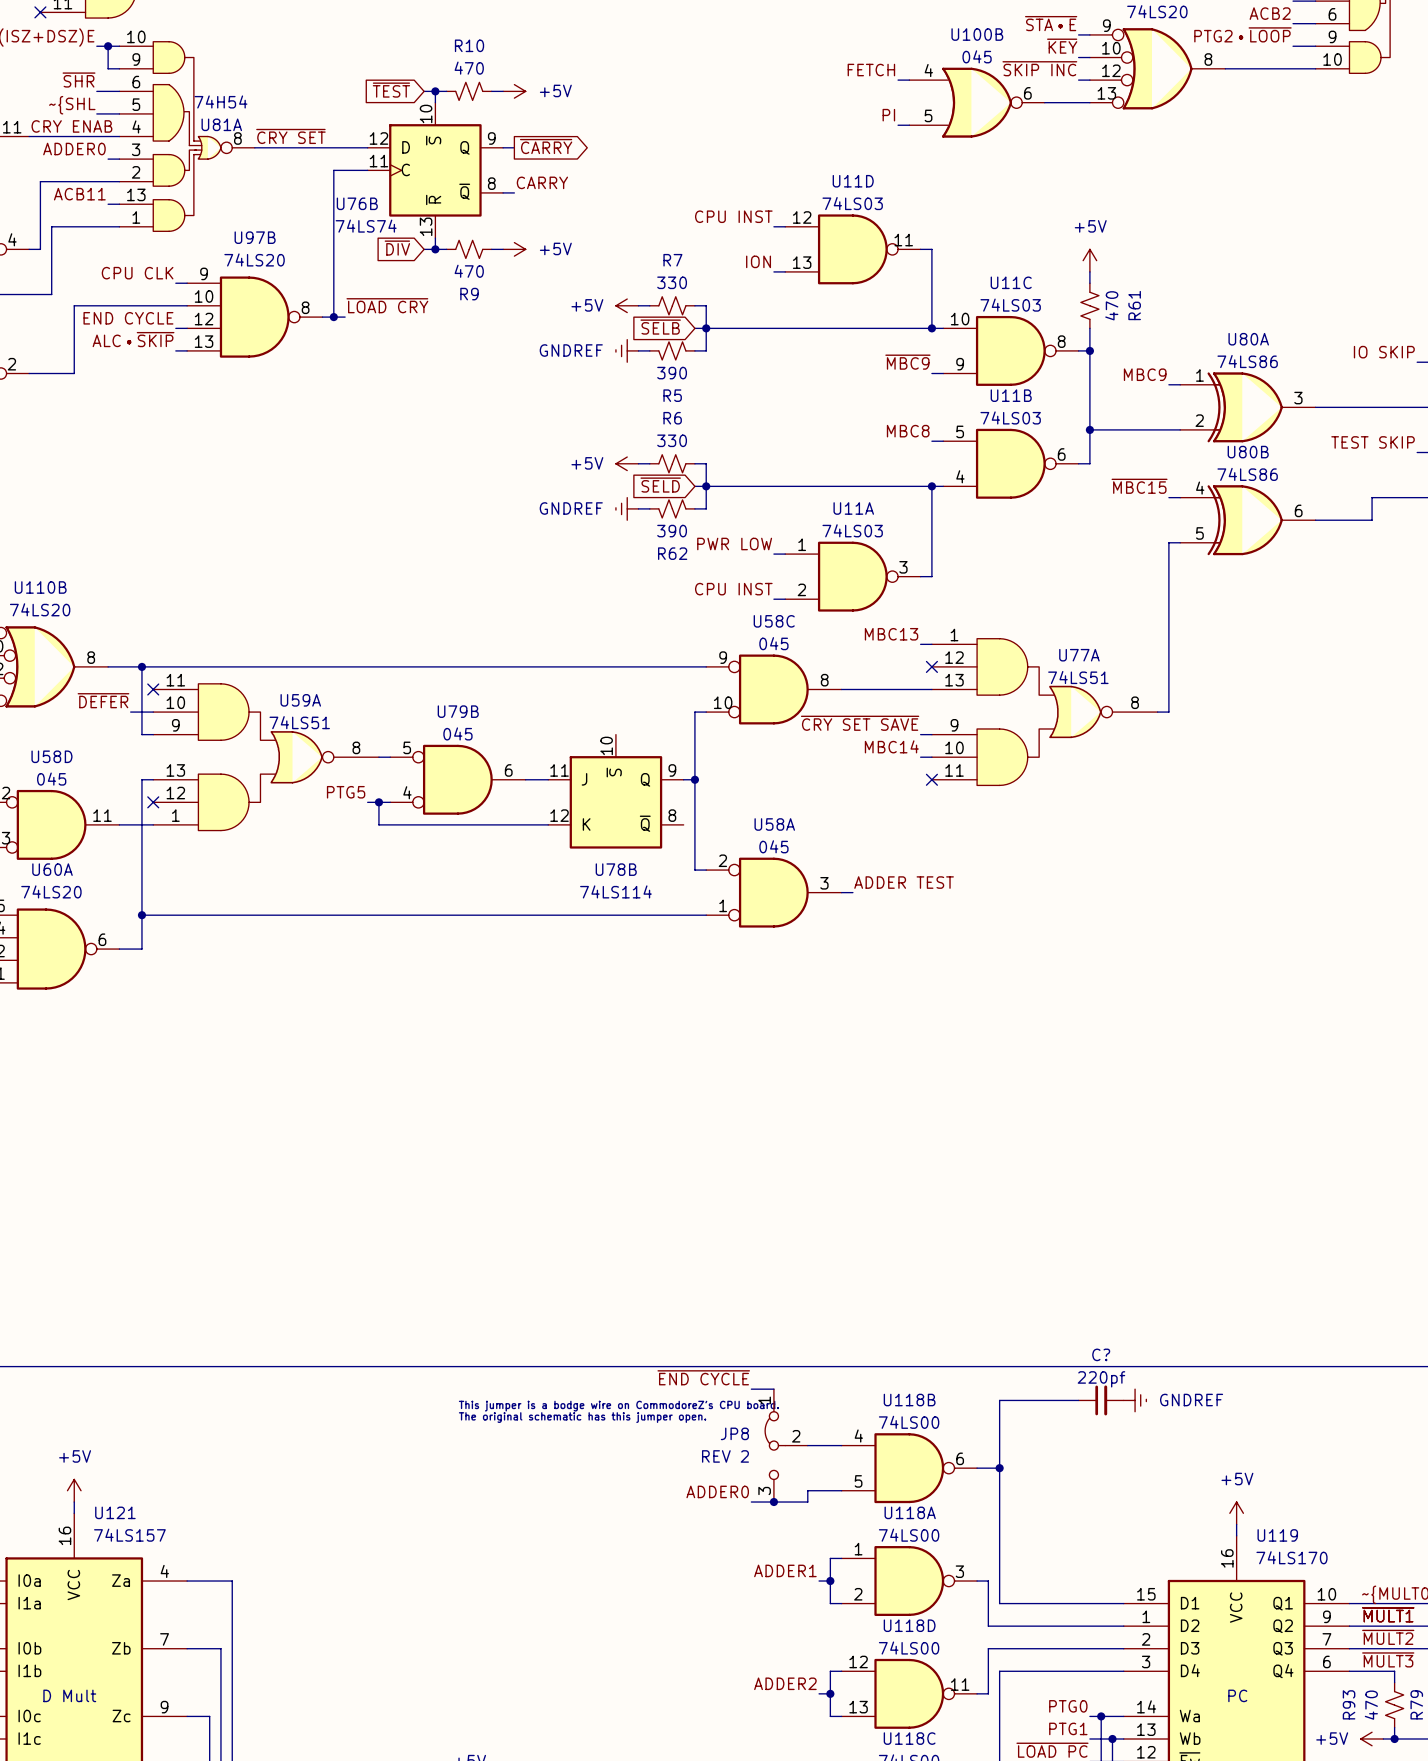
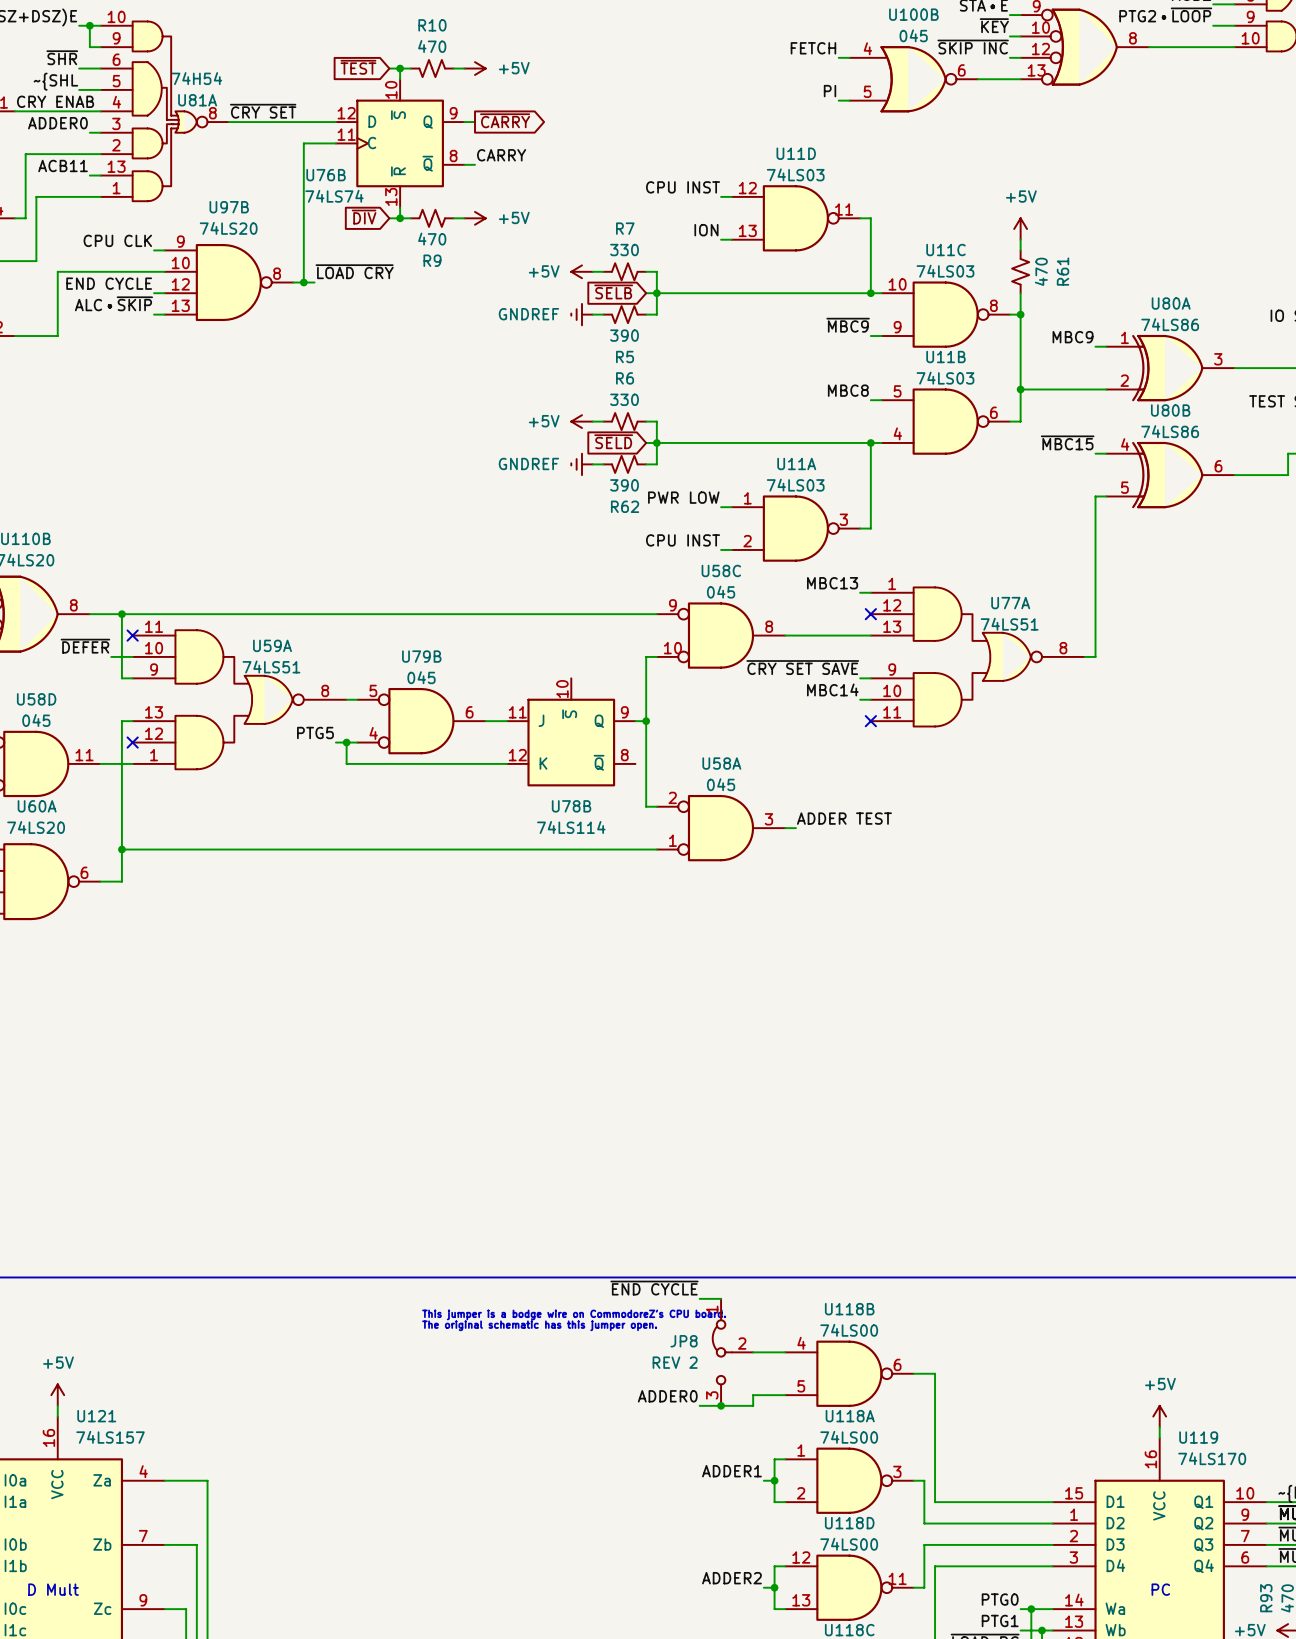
wire: (1078, 1400) (999, 1400) (999, 1468) -> none
C?: 220pf (1101, 1400) -> none
power symbol: GNDREF (1135, 1400) -> none
junction: (999, 1468) -> none

